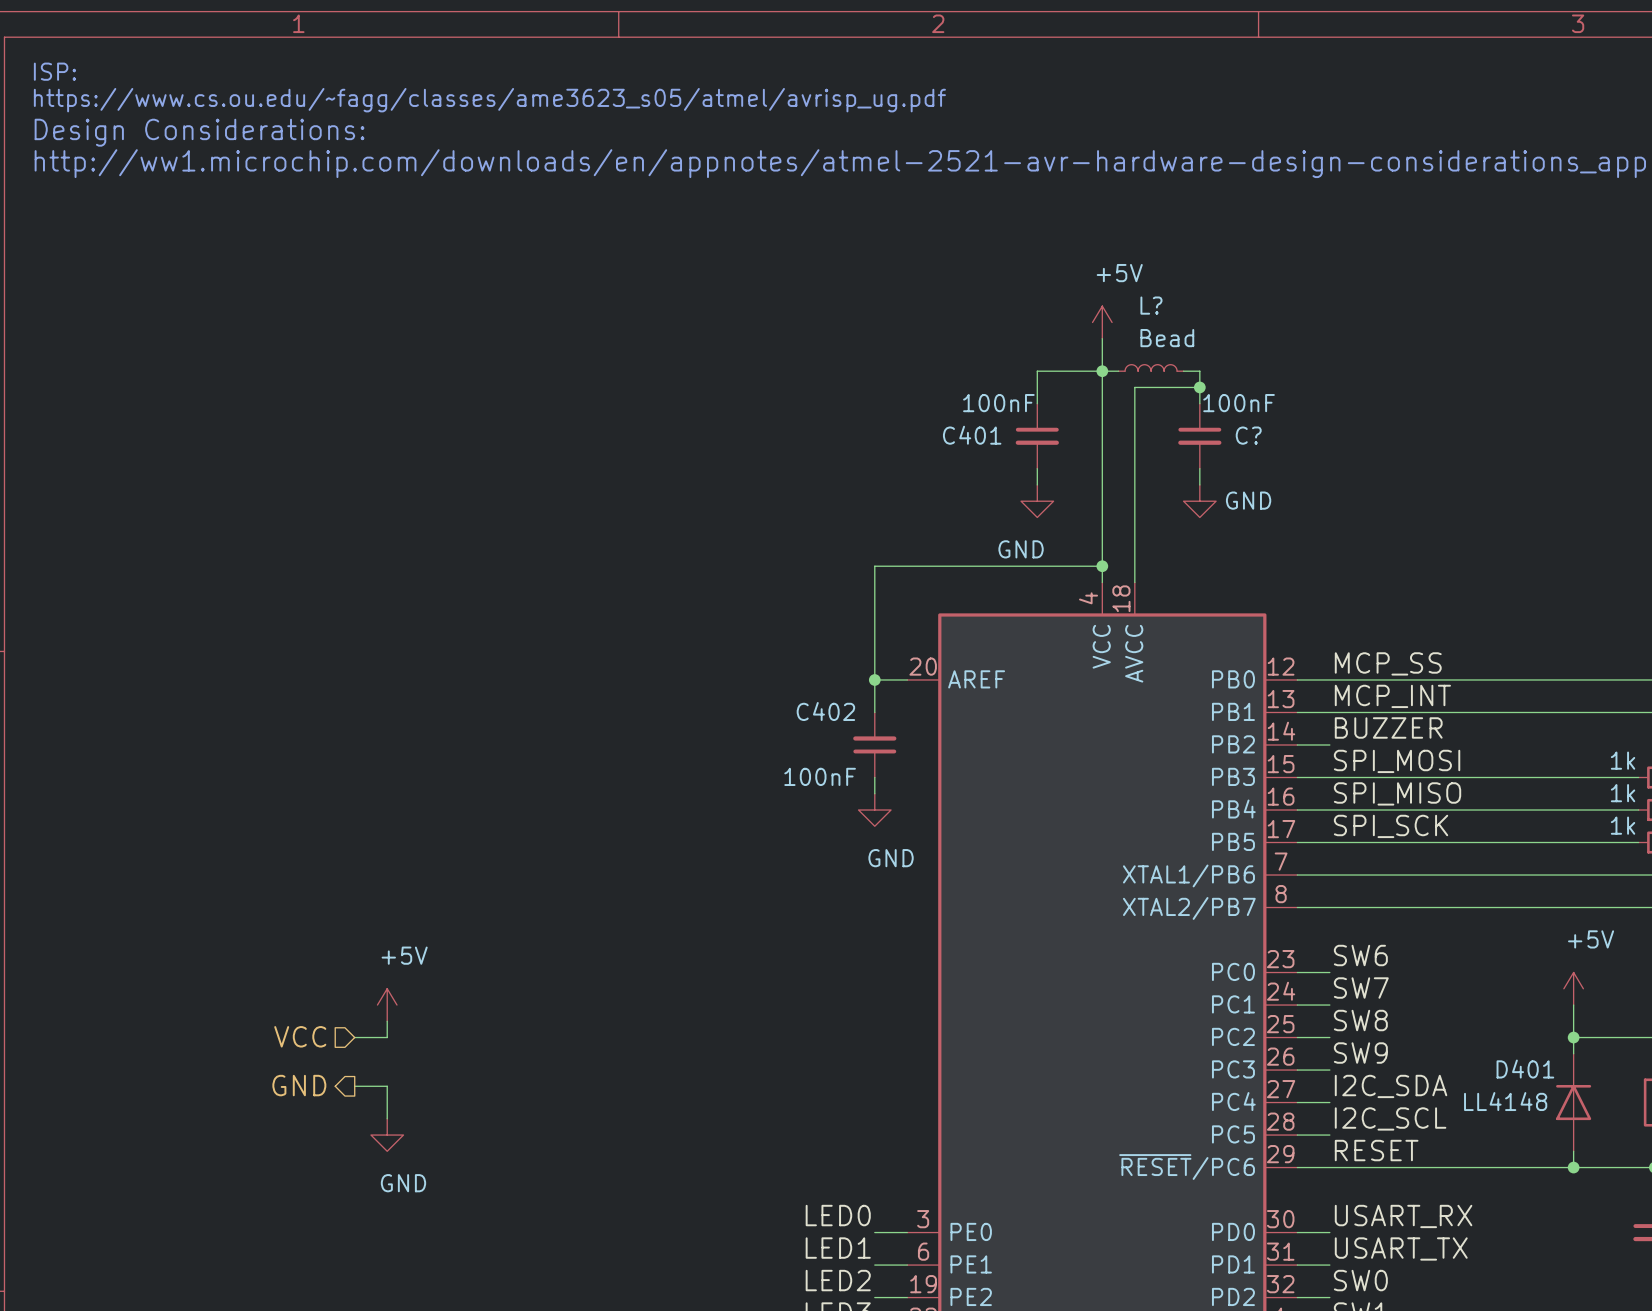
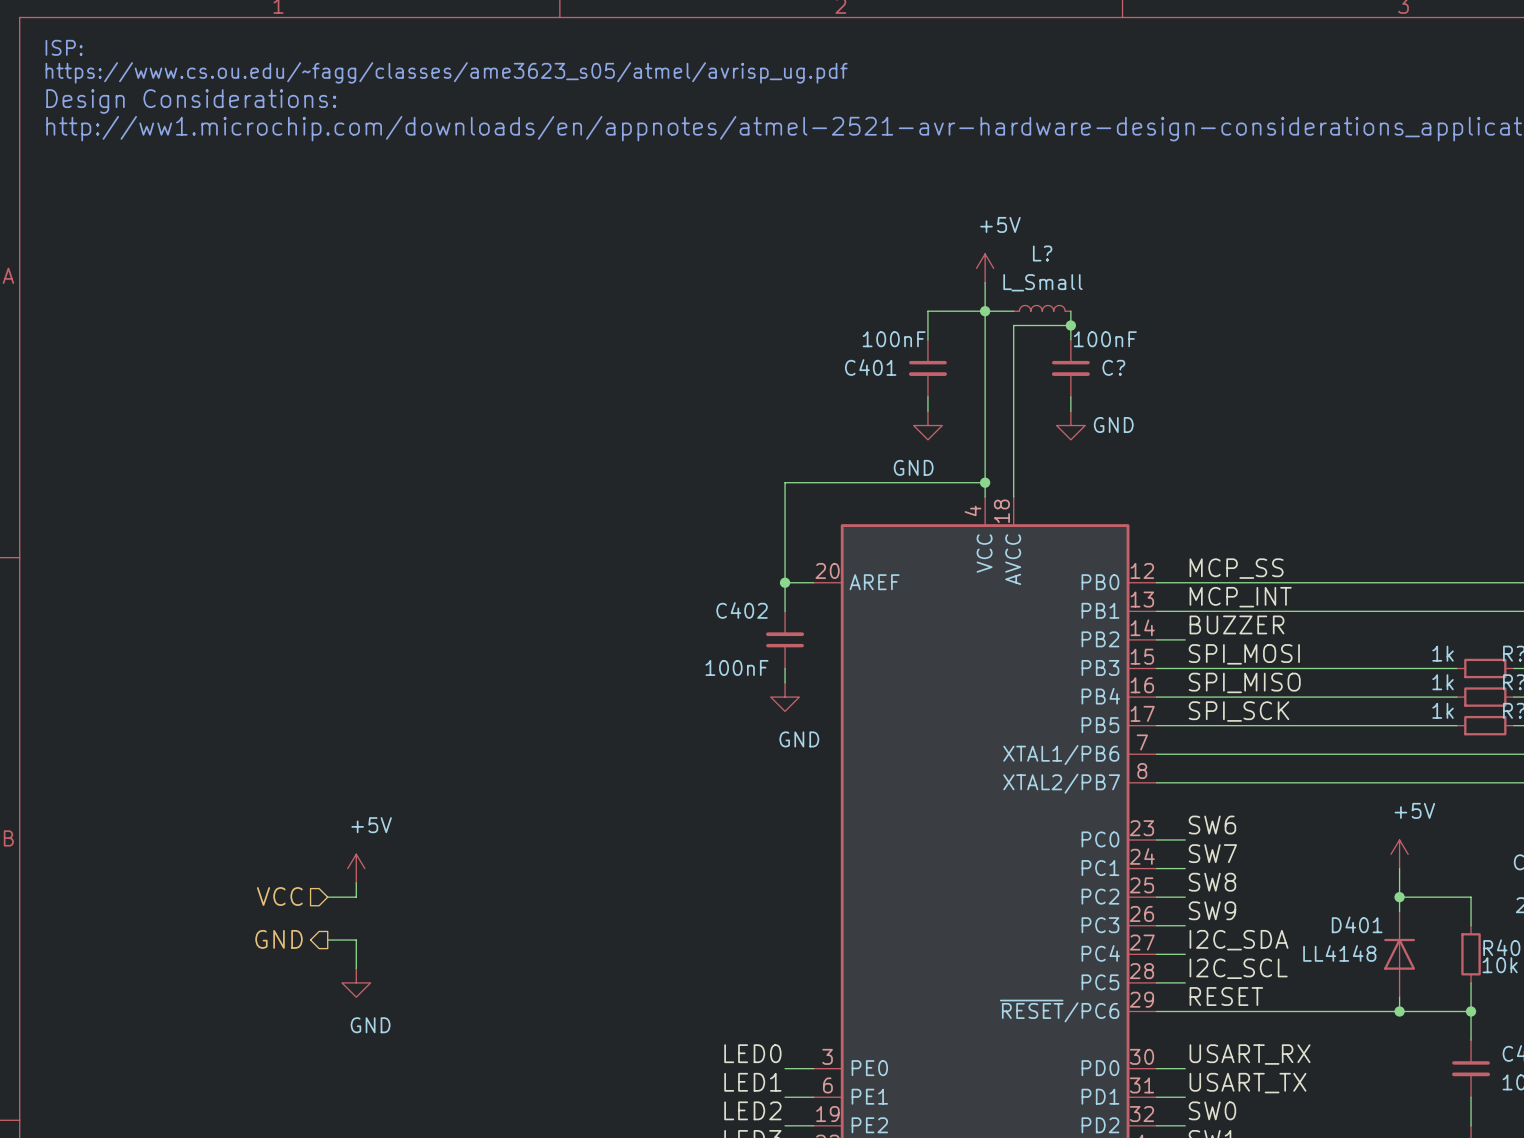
L?: Bead (1151, 367) -> none
L?: none -> L_Small (1042, 308)
wire: (1183, 371) (1199, 371) -> (999, 311) (1013, 311)

